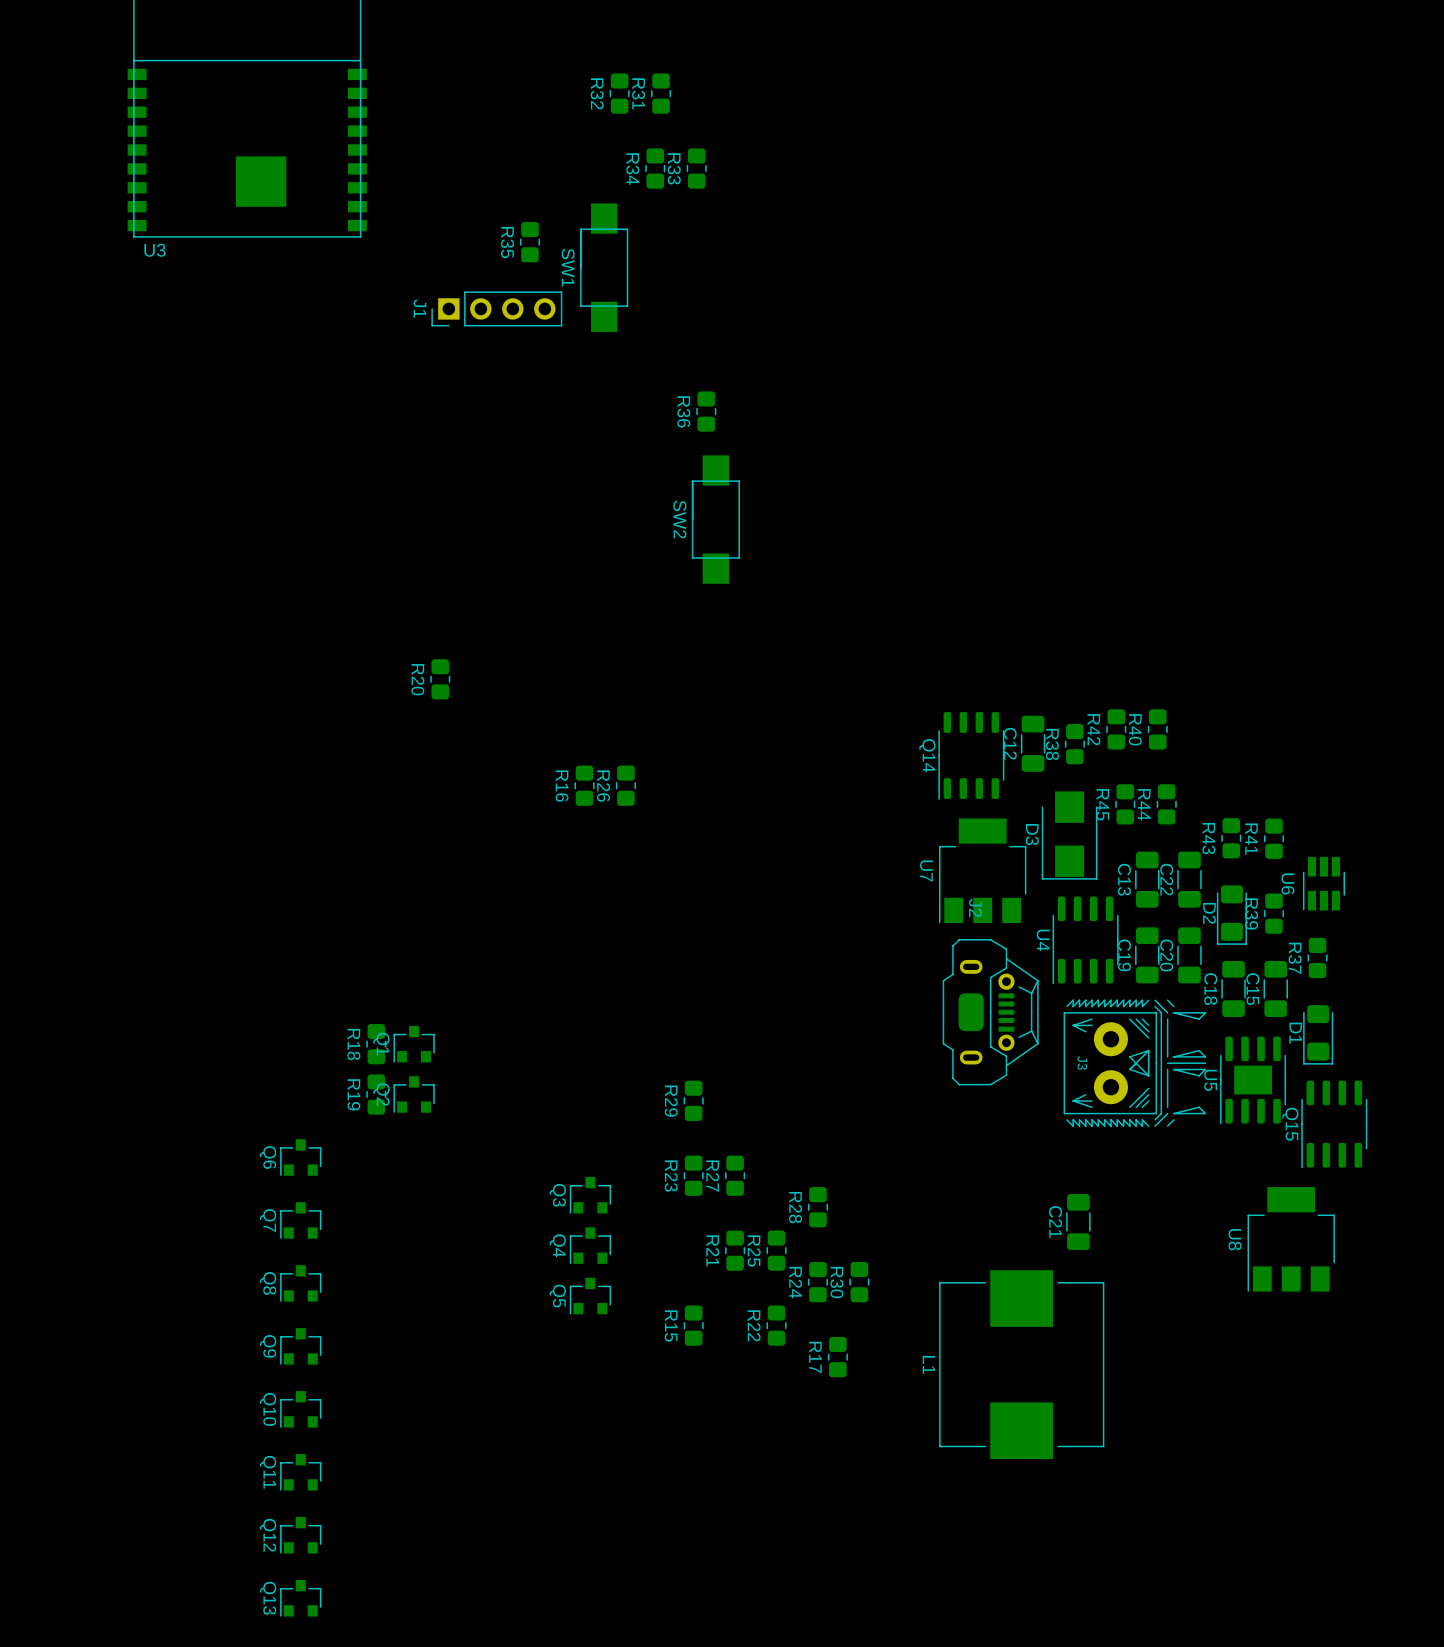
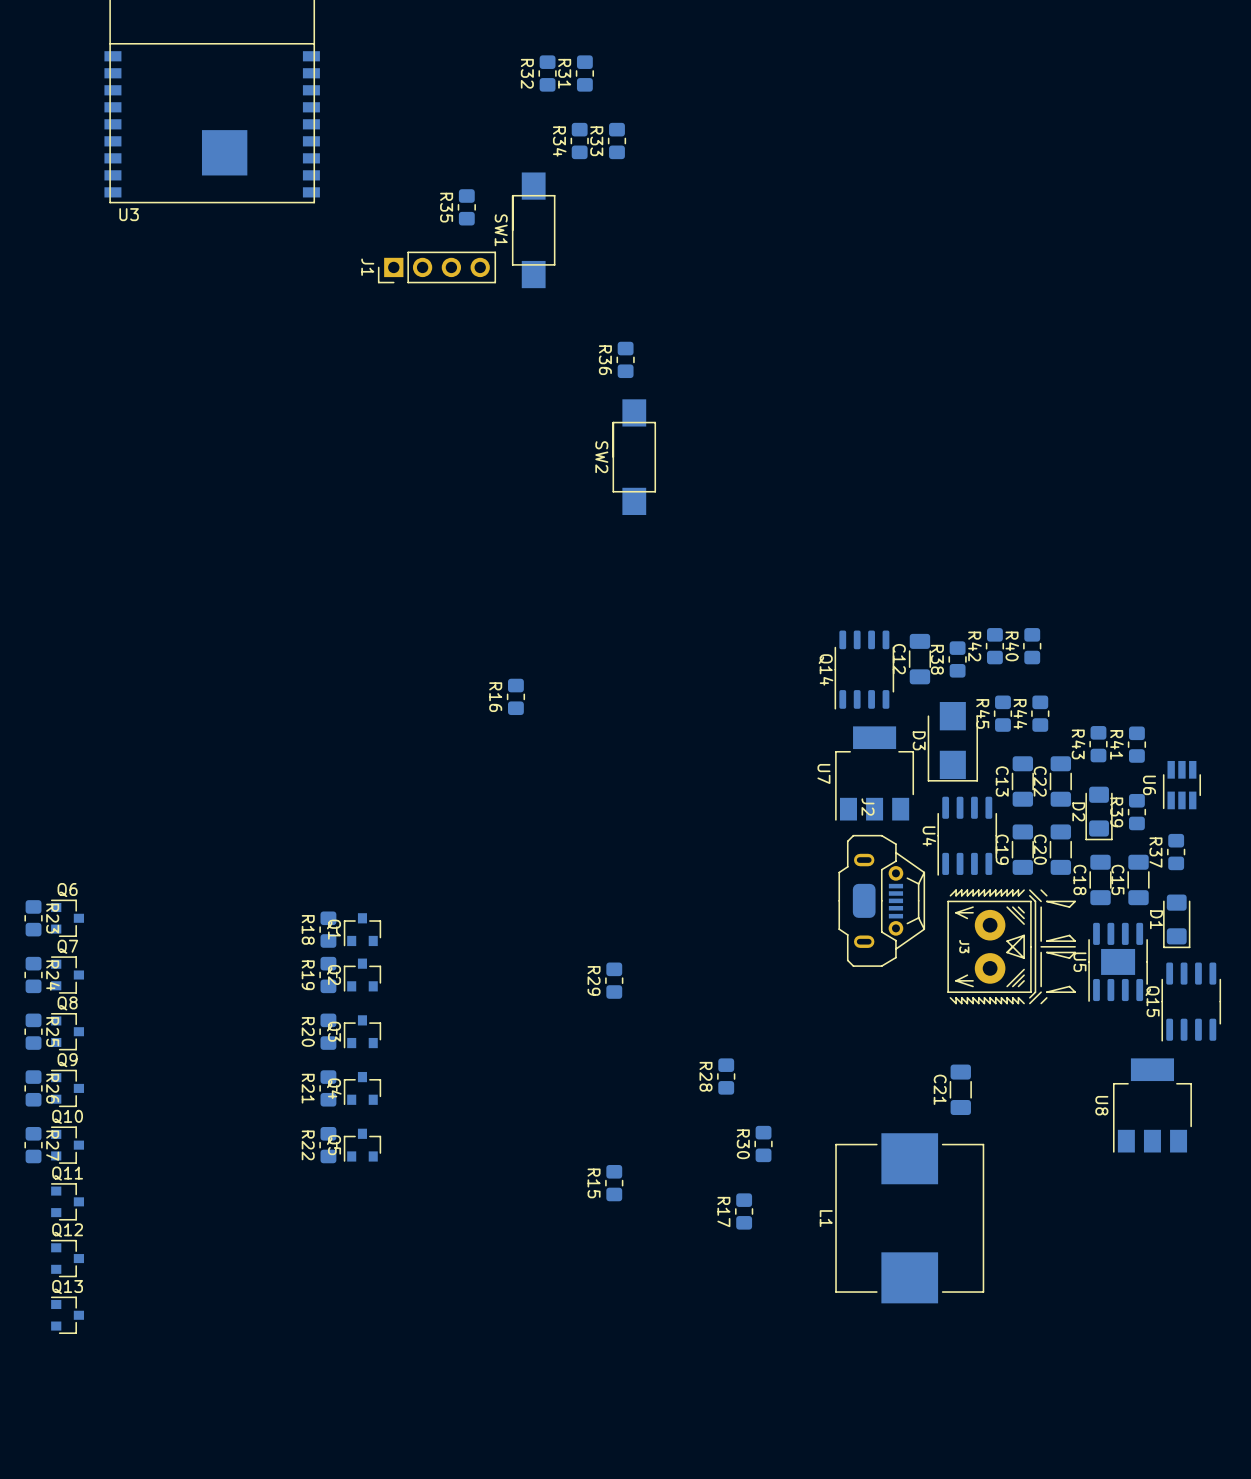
R20 position: (440, 679) -> (328, 1031)
R26 position: (625, 785) -> (33, 1088)
R26 name position: R26 (603, 786) -> R26 (52, 1088)
Q6 rotation: 0° (300, 1157) -> 90° clockwise (67, 918)
Q6 position: (300, 1157) -> (67, 918)
R23 position: (693, 1175) -> (33, 918)
R27 position: (735, 1175) -> (33, 1145)
R23 name position: R23 (671, 1176) -> R23 (52, 918)
R27 name position: R27 (712, 1176) -> R27 (52, 1145)
Q3 position: (590, 1195) -> (362, 1031)
Q7 rotation: 0° (300, 1220) -> 90° clockwise (67, 975)
Q7 position: (300, 1220) -> (67, 975)
Q4 position: (590, 1245) -> (362, 1088)
R21 position: (735, 1250) -> (328, 1088)
R25 position: (776, 1250) -> (33, 1031)
R25 name position: R25 (754, 1251) -> R25 (52, 1031)
R24 name position: R24 (795, 1282) -> R24 (52, 975)
R24 position: (817, 1282) -> (33, 975)
Q8 rotation: 0° (300, 1283) -> 90° clockwise (67, 1031)
Q8 position: (300, 1283) -> (67, 1031)
Q5 position: (590, 1296) -> (362, 1145)
R22 position: (776, 1325) -> (328, 1145)
Q9 rotation: 0° (300, 1346) -> 90° clockwise (67, 1088)
Q9 position: (300, 1346) -> (67, 1088)
Q10 rotation: 0° (300, 1409) -> 90° clockwise (67, 1145)
Q10 position: (300, 1409) -> (67, 1145)
Q11 rotation: 0° (300, 1472) -> 90° clockwise (67, 1201)
Q11 position: (300, 1472) -> (67, 1201)
Q12 rotation: 0° (300, 1535) -> 90° clockwise (67, 1258)
Q12 position: (300, 1535) -> (67, 1258)
Q13 rotation: 0° (300, 1598) -> 90° clockwise (67, 1315)
Q13 position: (300, 1598) -> (67, 1315)

